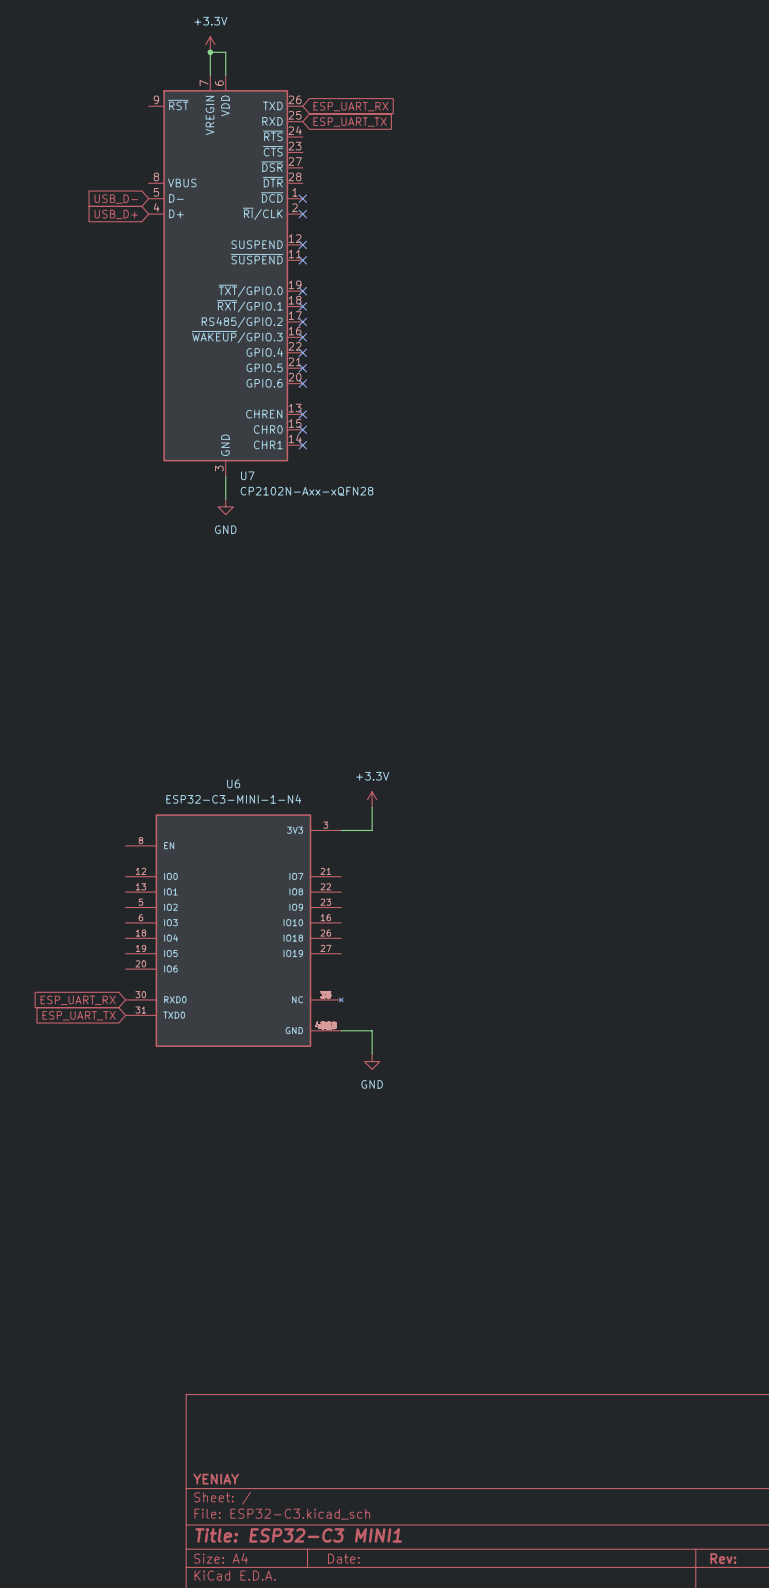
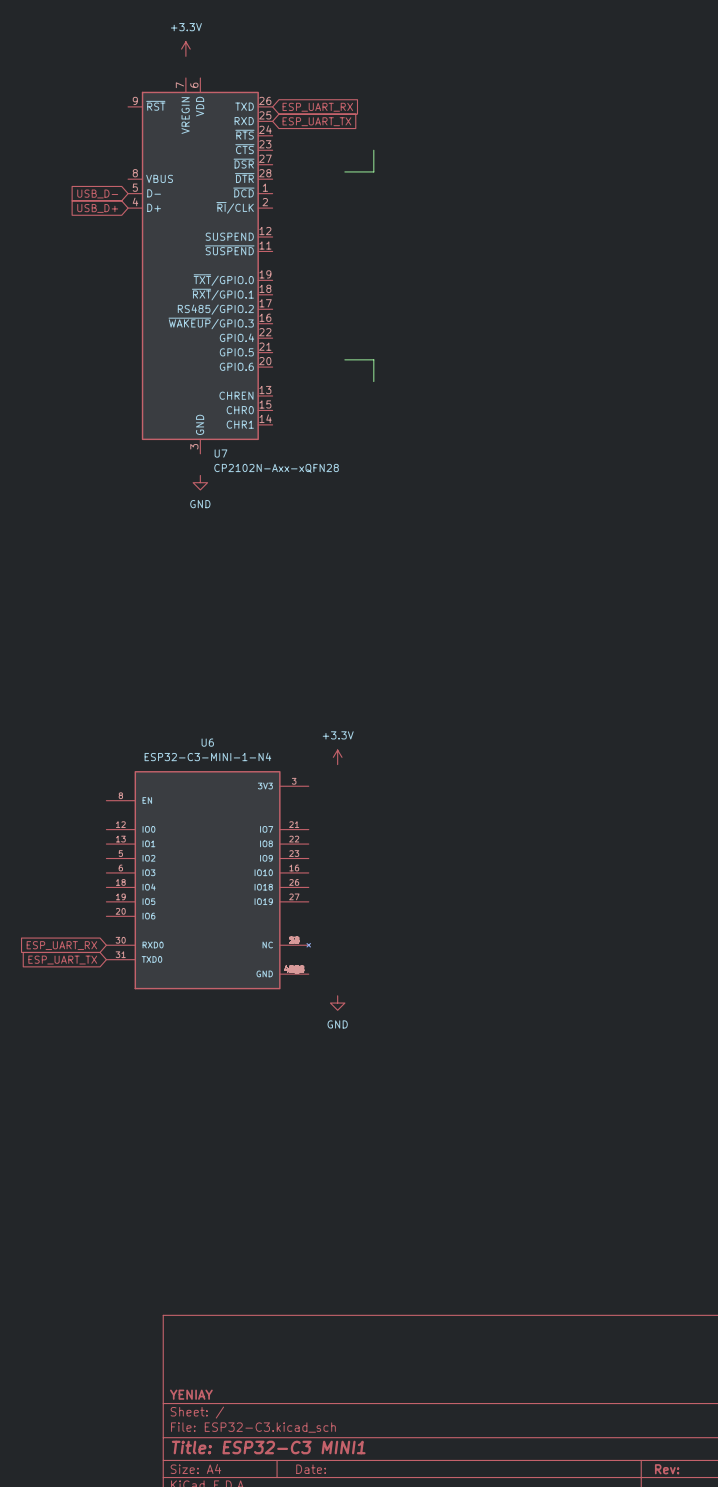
junction: (210, 52) -> none
wire: (210, 75) (210, 52) (225, 52) (225, 75) -> none
wire: none -> (373, 150) (373, 171) (344, 171)
no-connect mark: (302, 198) -> none
no-connect mark: (302, 214) -> none
no-connect mark: (302, 244) -> none
no-connect mark: (302, 260) -> none
no-connect mark: (302, 291) -> none
no-connect mark: (302, 306) -> none
no-connect mark: (302, 321) -> none
no-connect mark: (302, 337) -> none
no-connect mark: (302, 352) -> none
no-connect mark: (302, 368) -> none
wire: none -> (344, 359) (373, 359) (373, 381)
no-connect mark: (302, 383) -> none
no-connect mark: (302, 414) -> none
no-connect mark: (302, 429) -> none
no-connect mark: (302, 445) -> none
wire: (225, 476) (225, 499) -> none
wire: (372, 807) (372, 830) (341, 830) -> none
wire: (341, 1030) (372, 1030) (372, 1053) -> none

